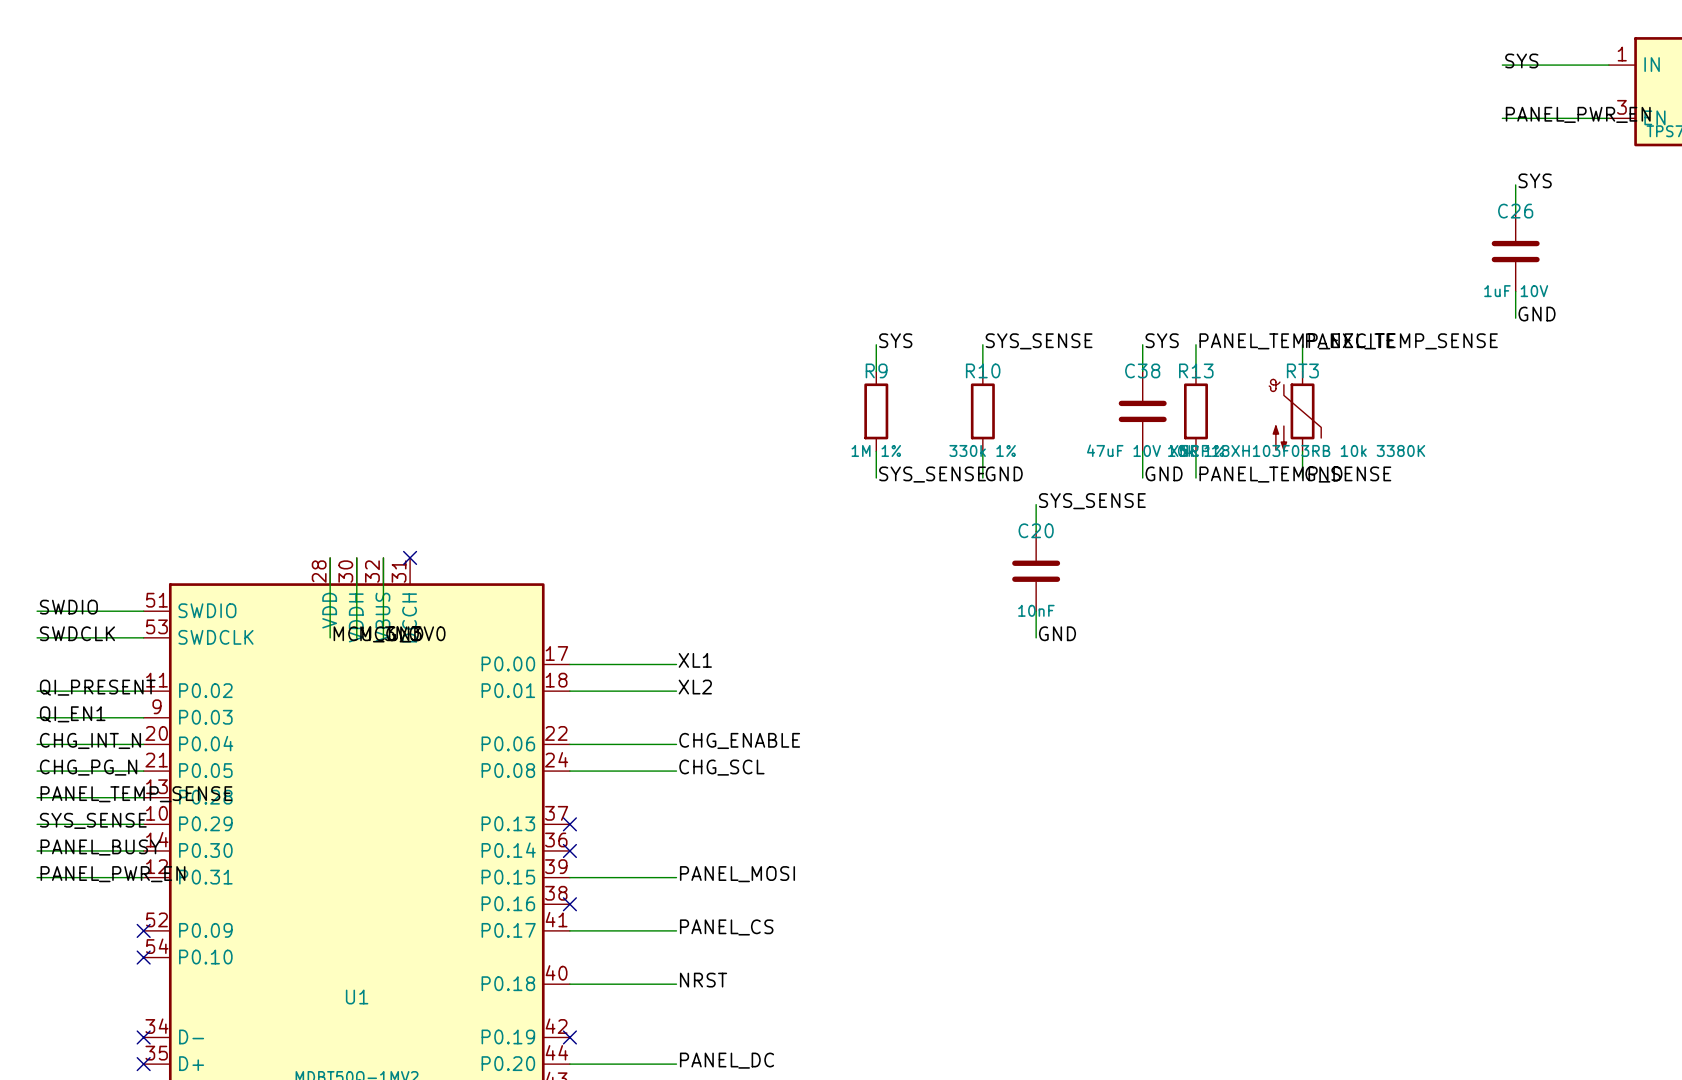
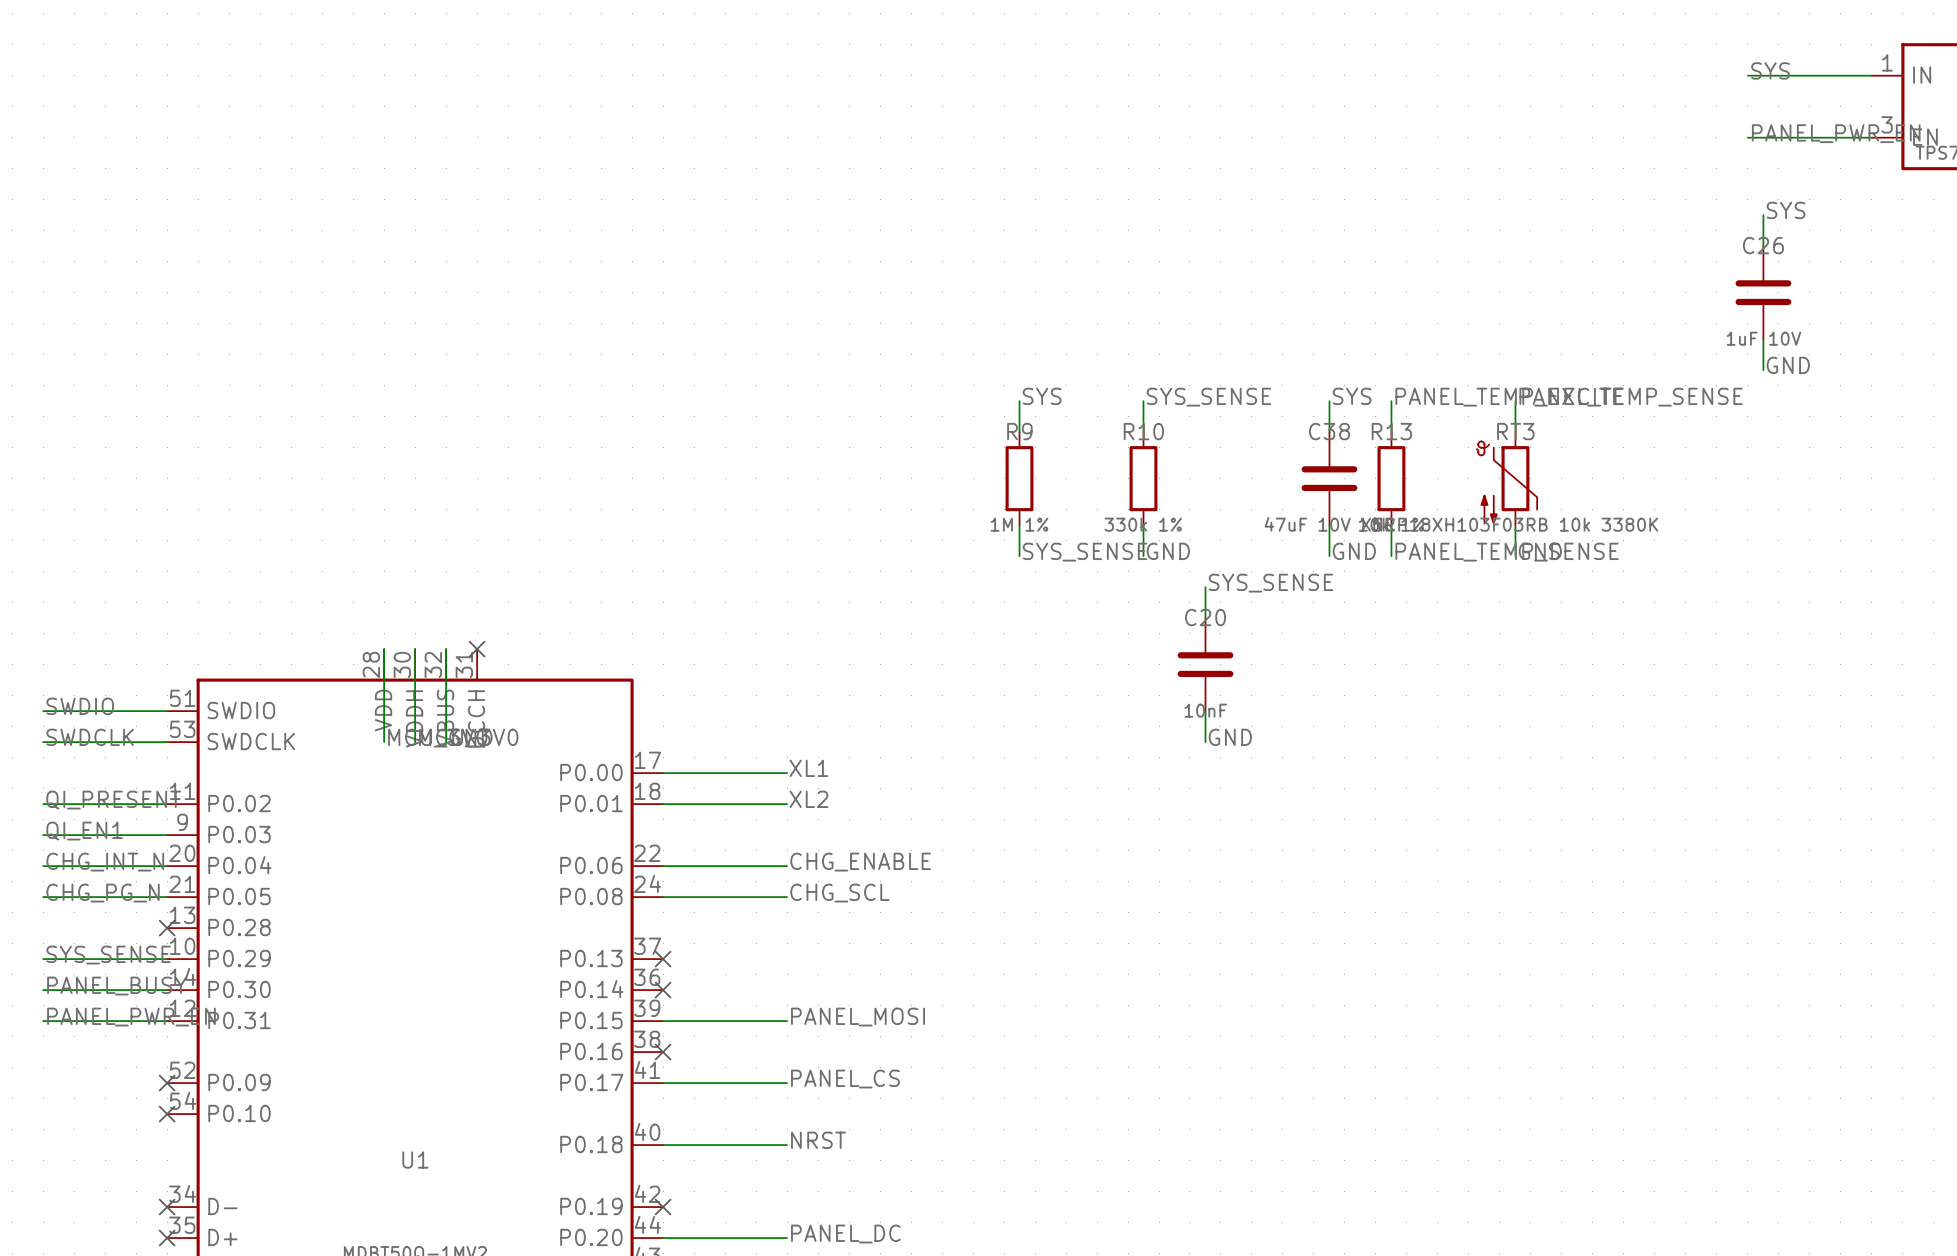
label: PANEL_TEMP_SENSE (136, 794) -> none
wire: (37, 797) (143, 797) -> none
no-connect mark: none -> (167, 928)

